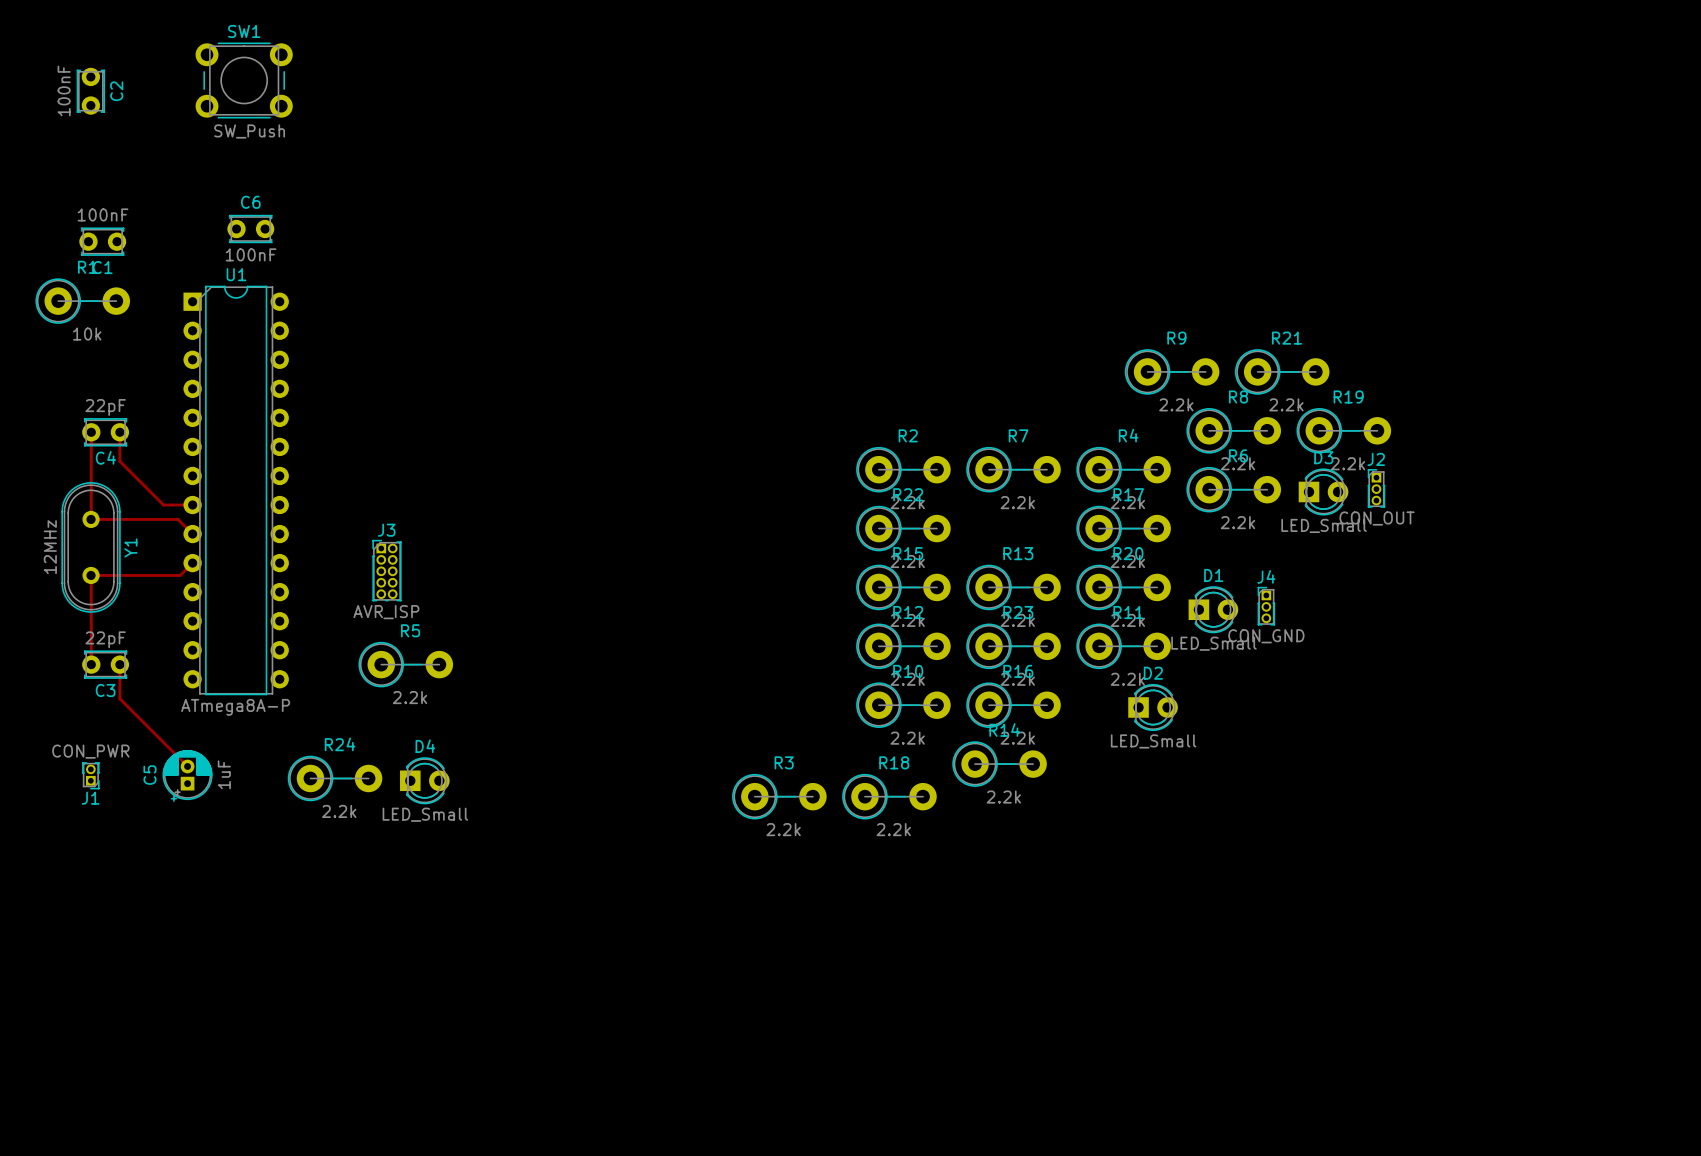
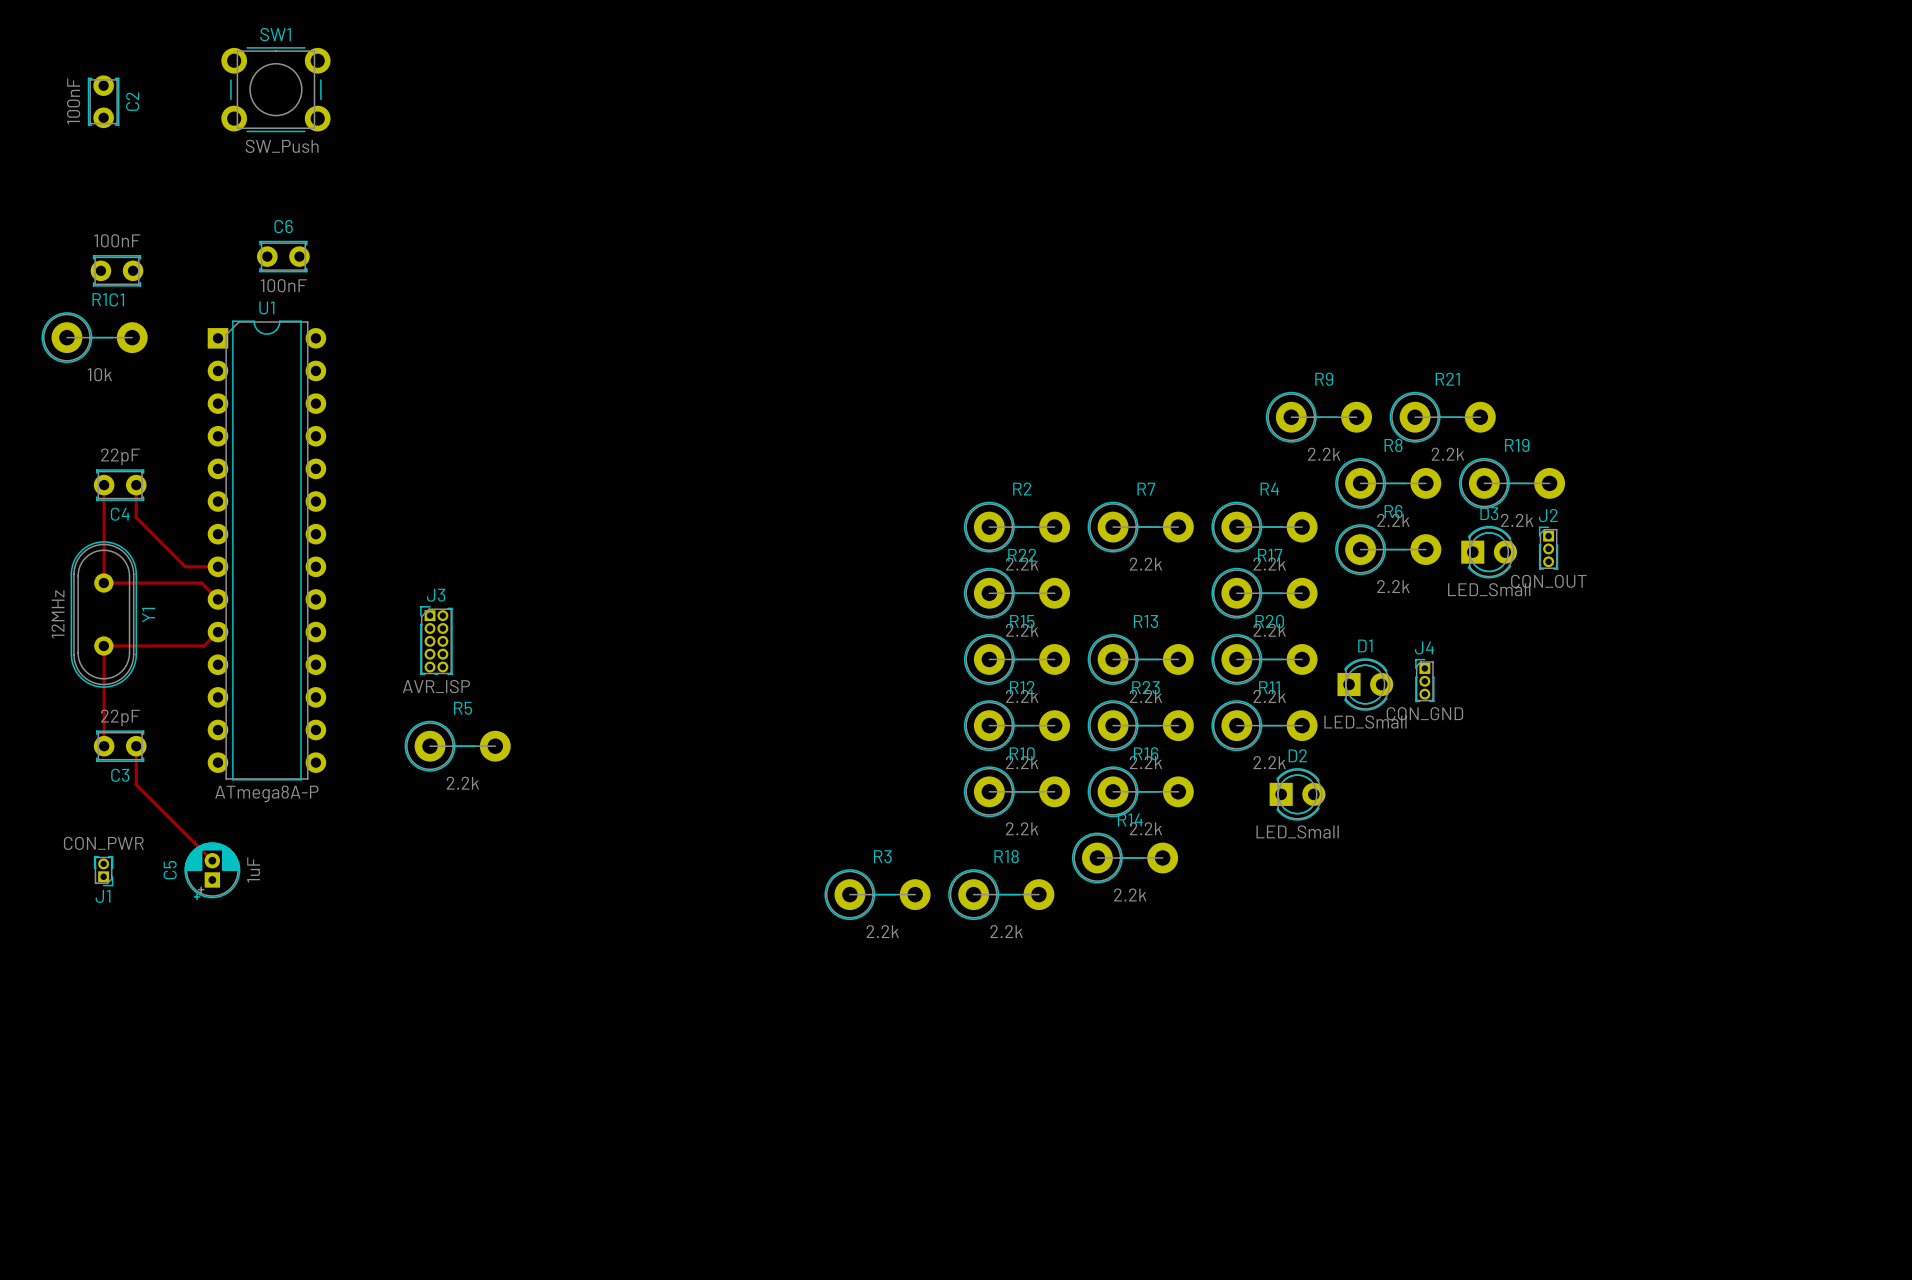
R24: 2.2k (335, 778) -> none
D4: LED_Small (424, 780) -> none

